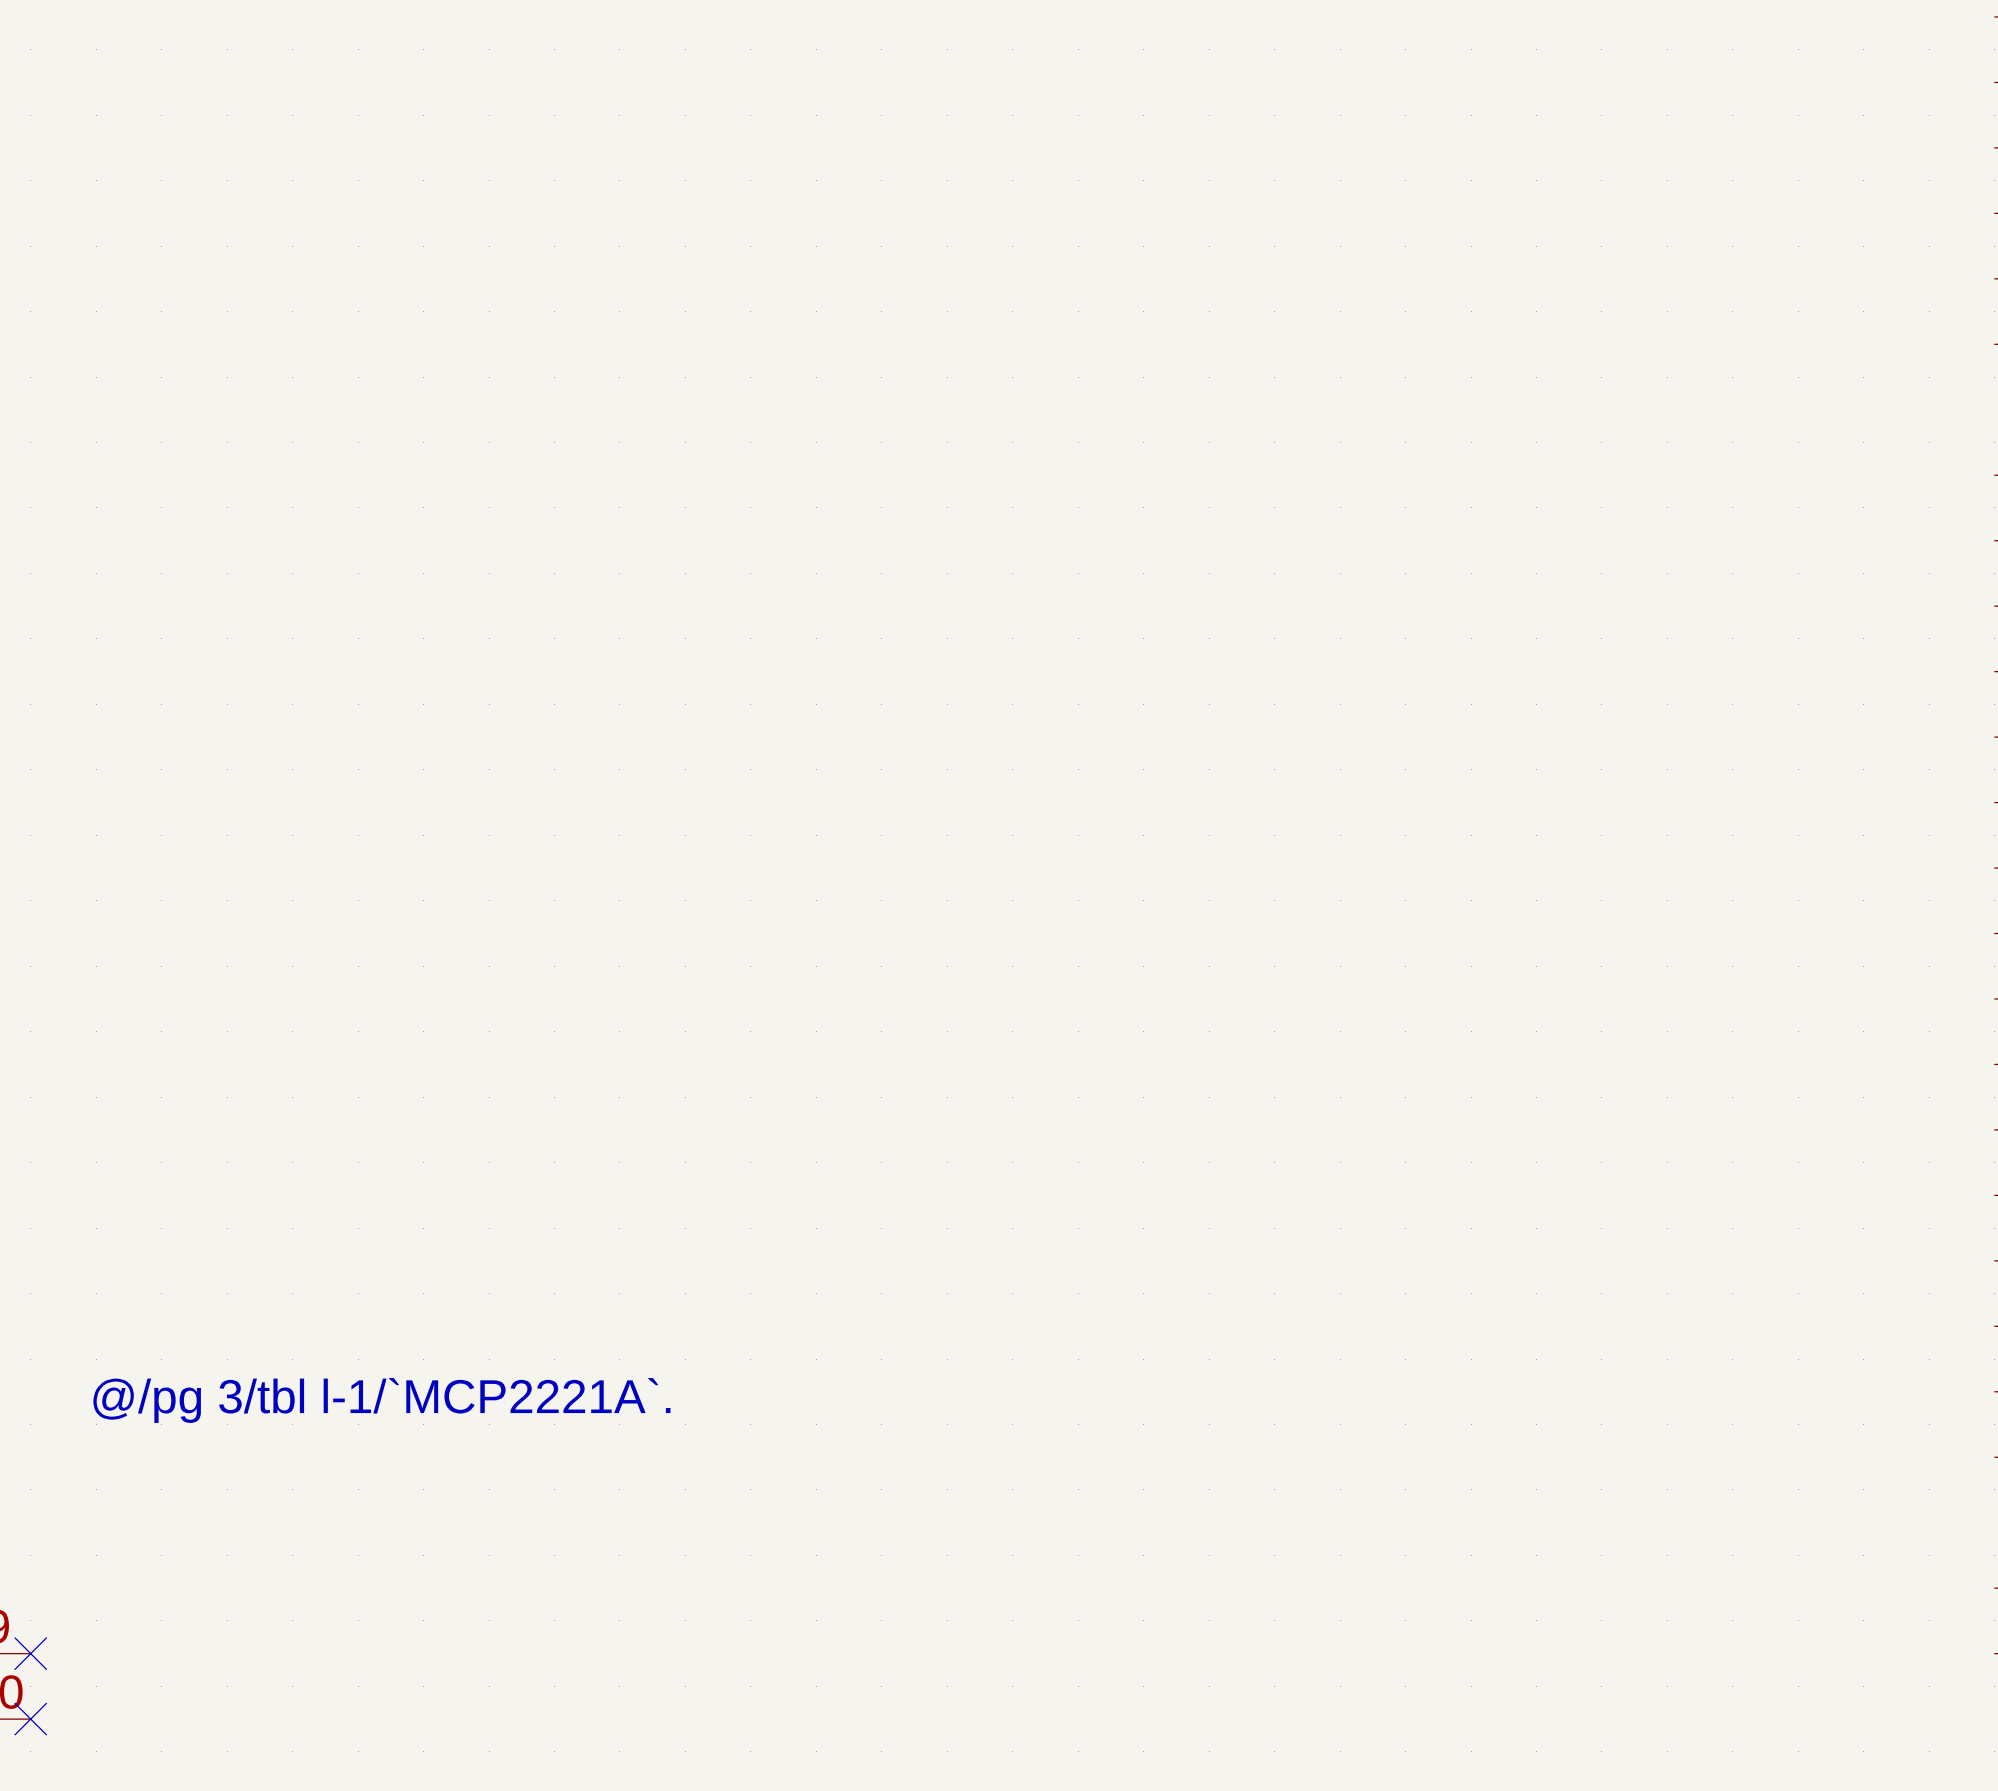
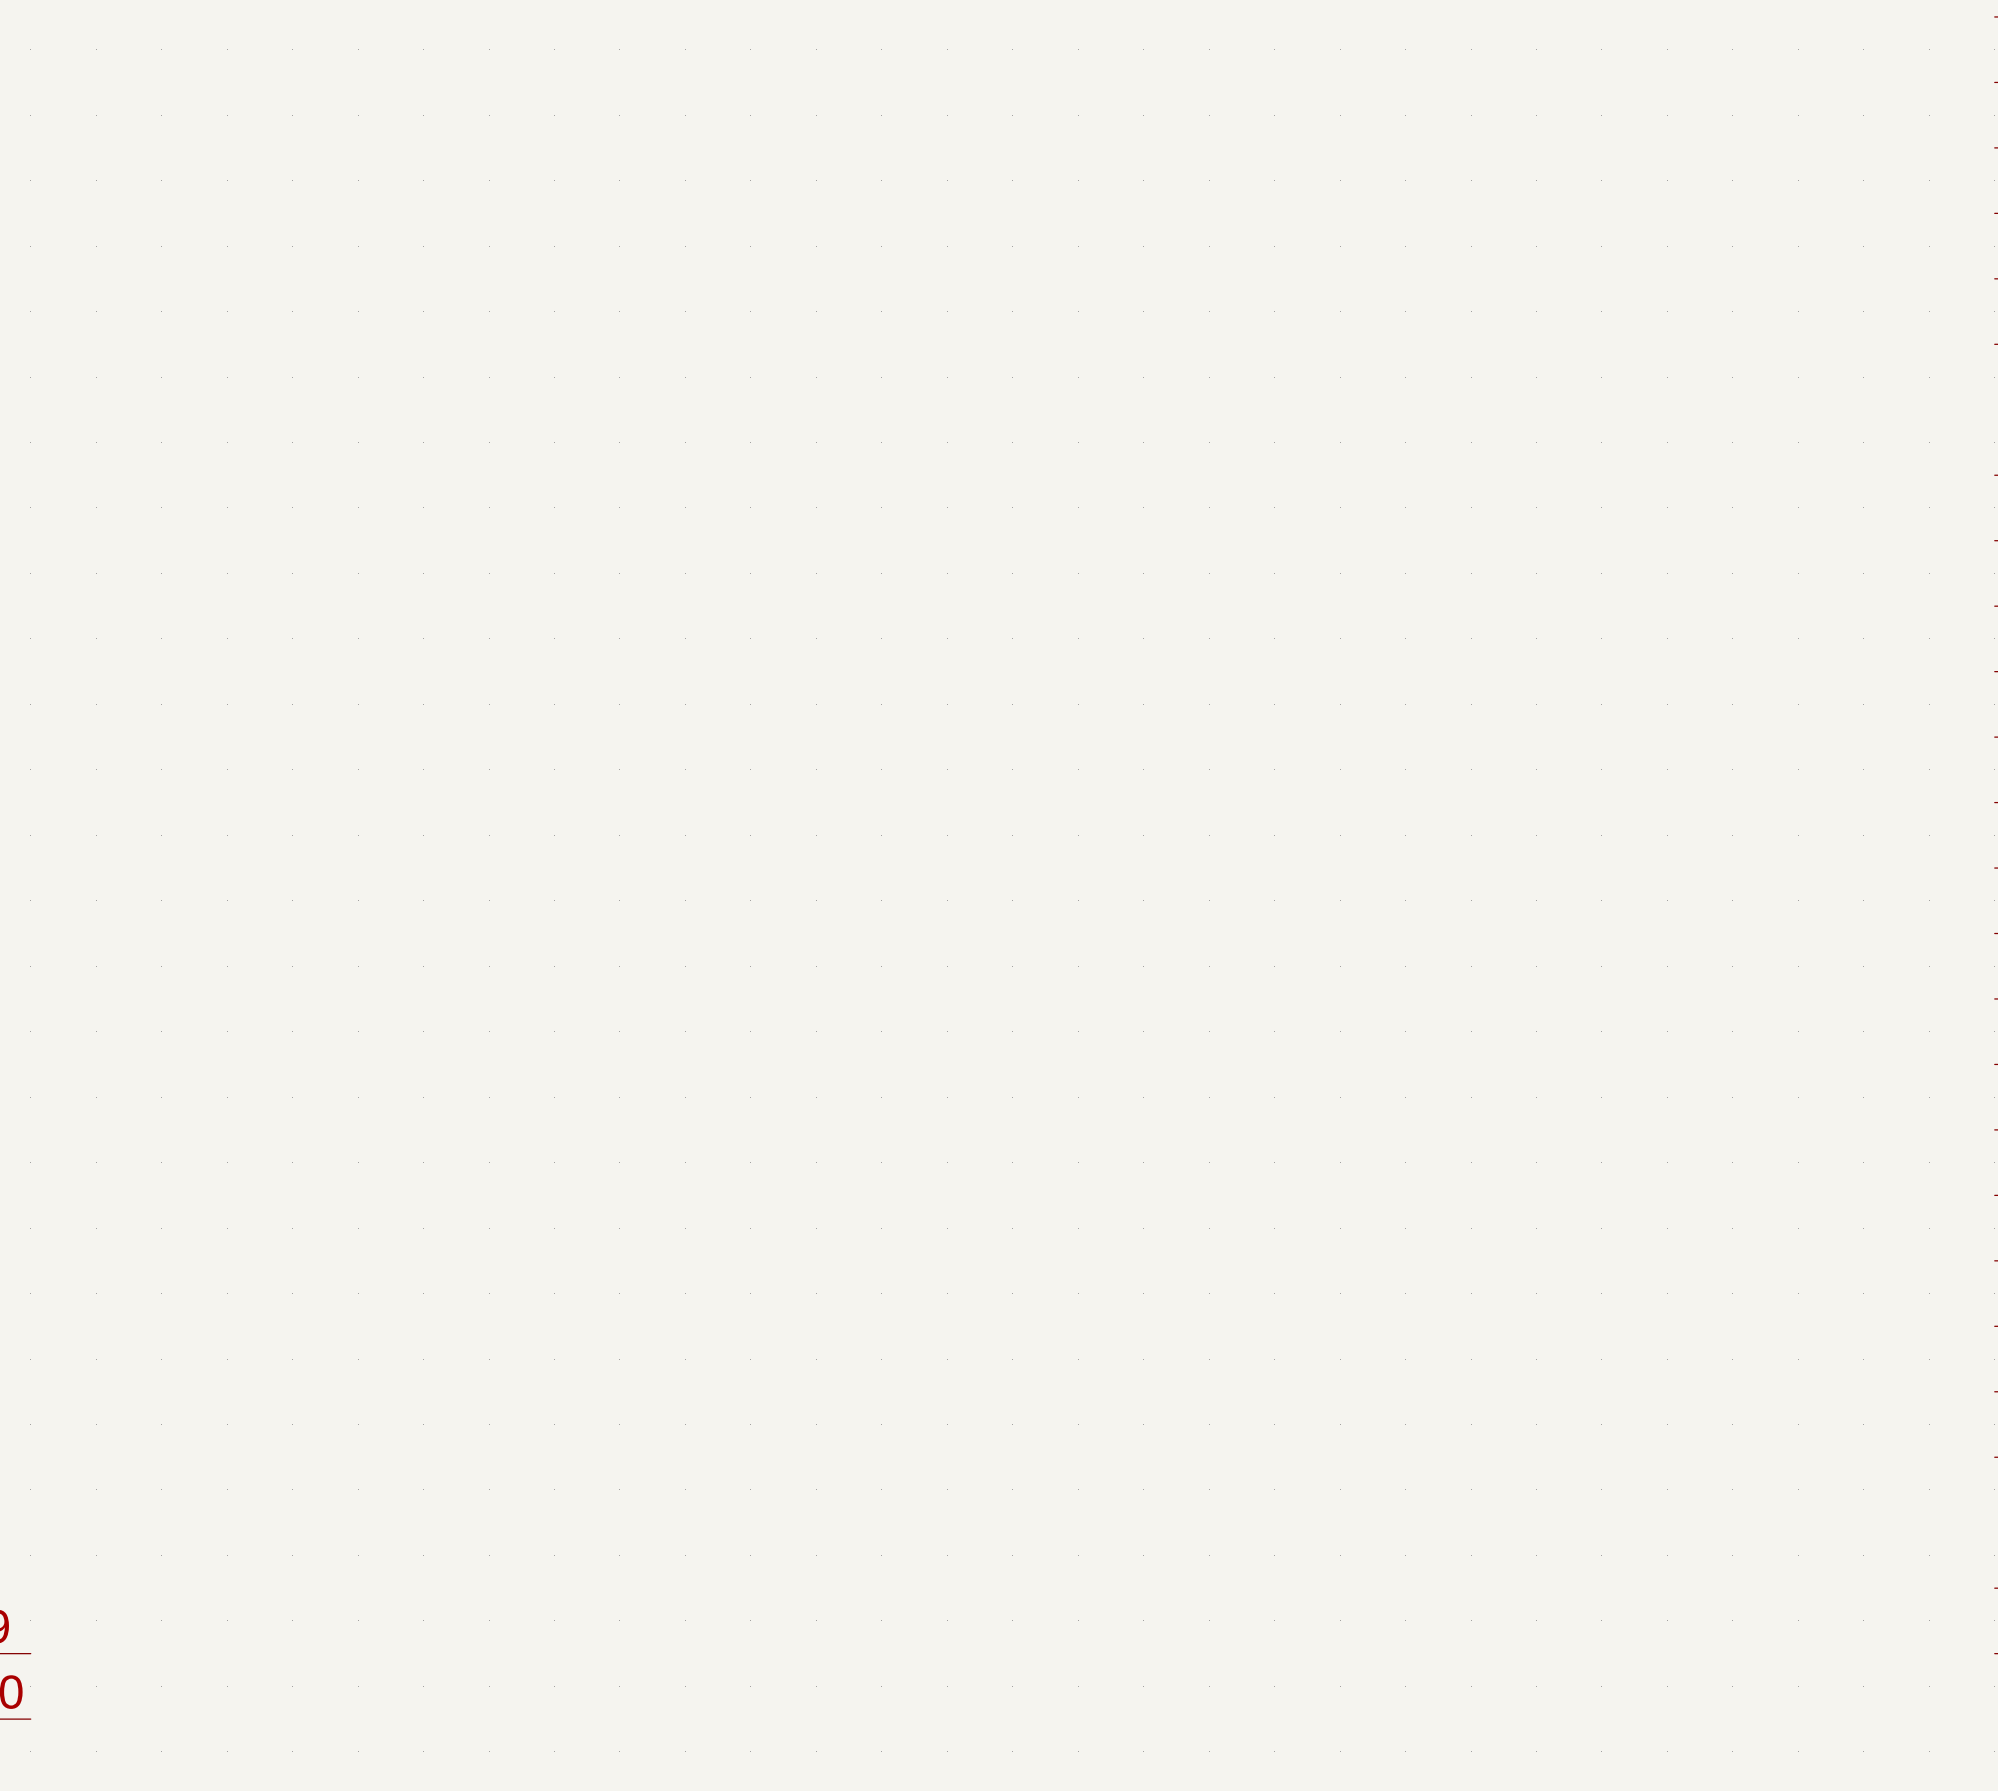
text: @/pg 3/tbl l-1/`MCP2221A`. (381, 1400) -> none
no-connect mark: (30, 1653) -> none
no-connect mark: (30, 1719) -> none

